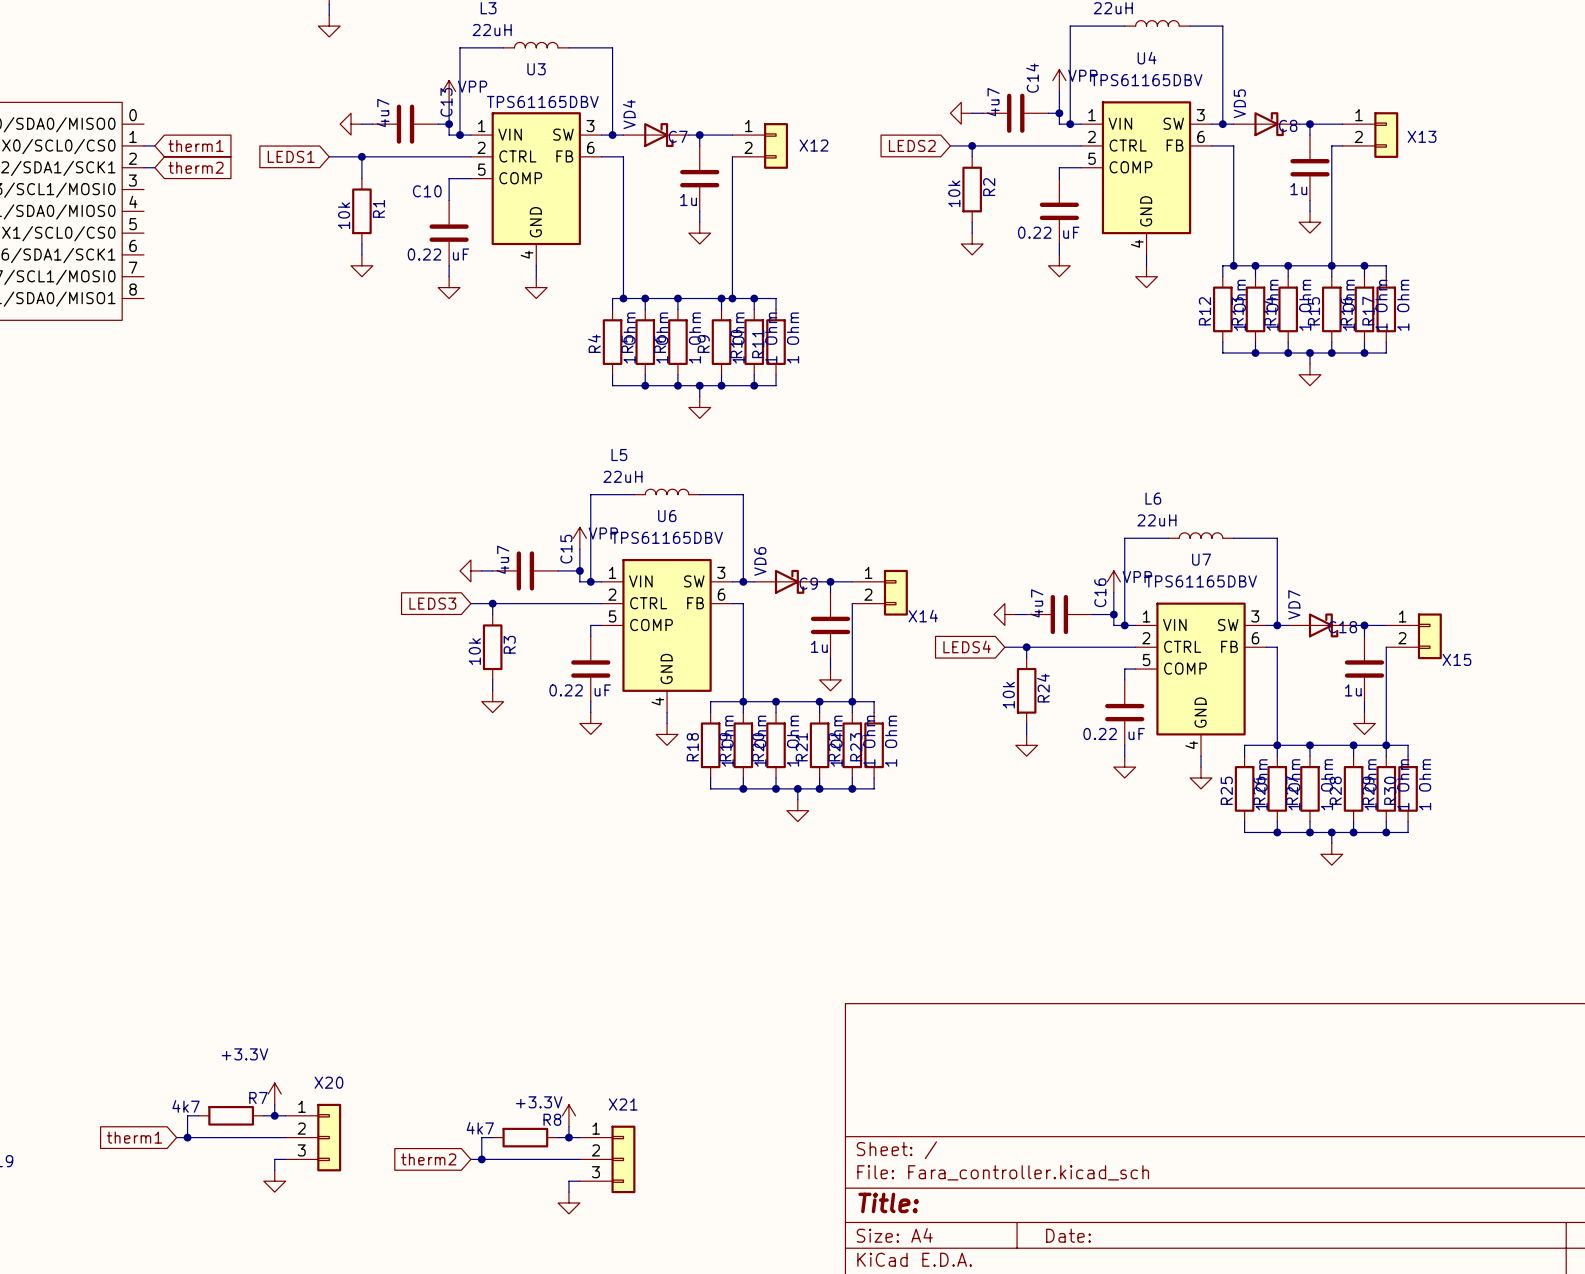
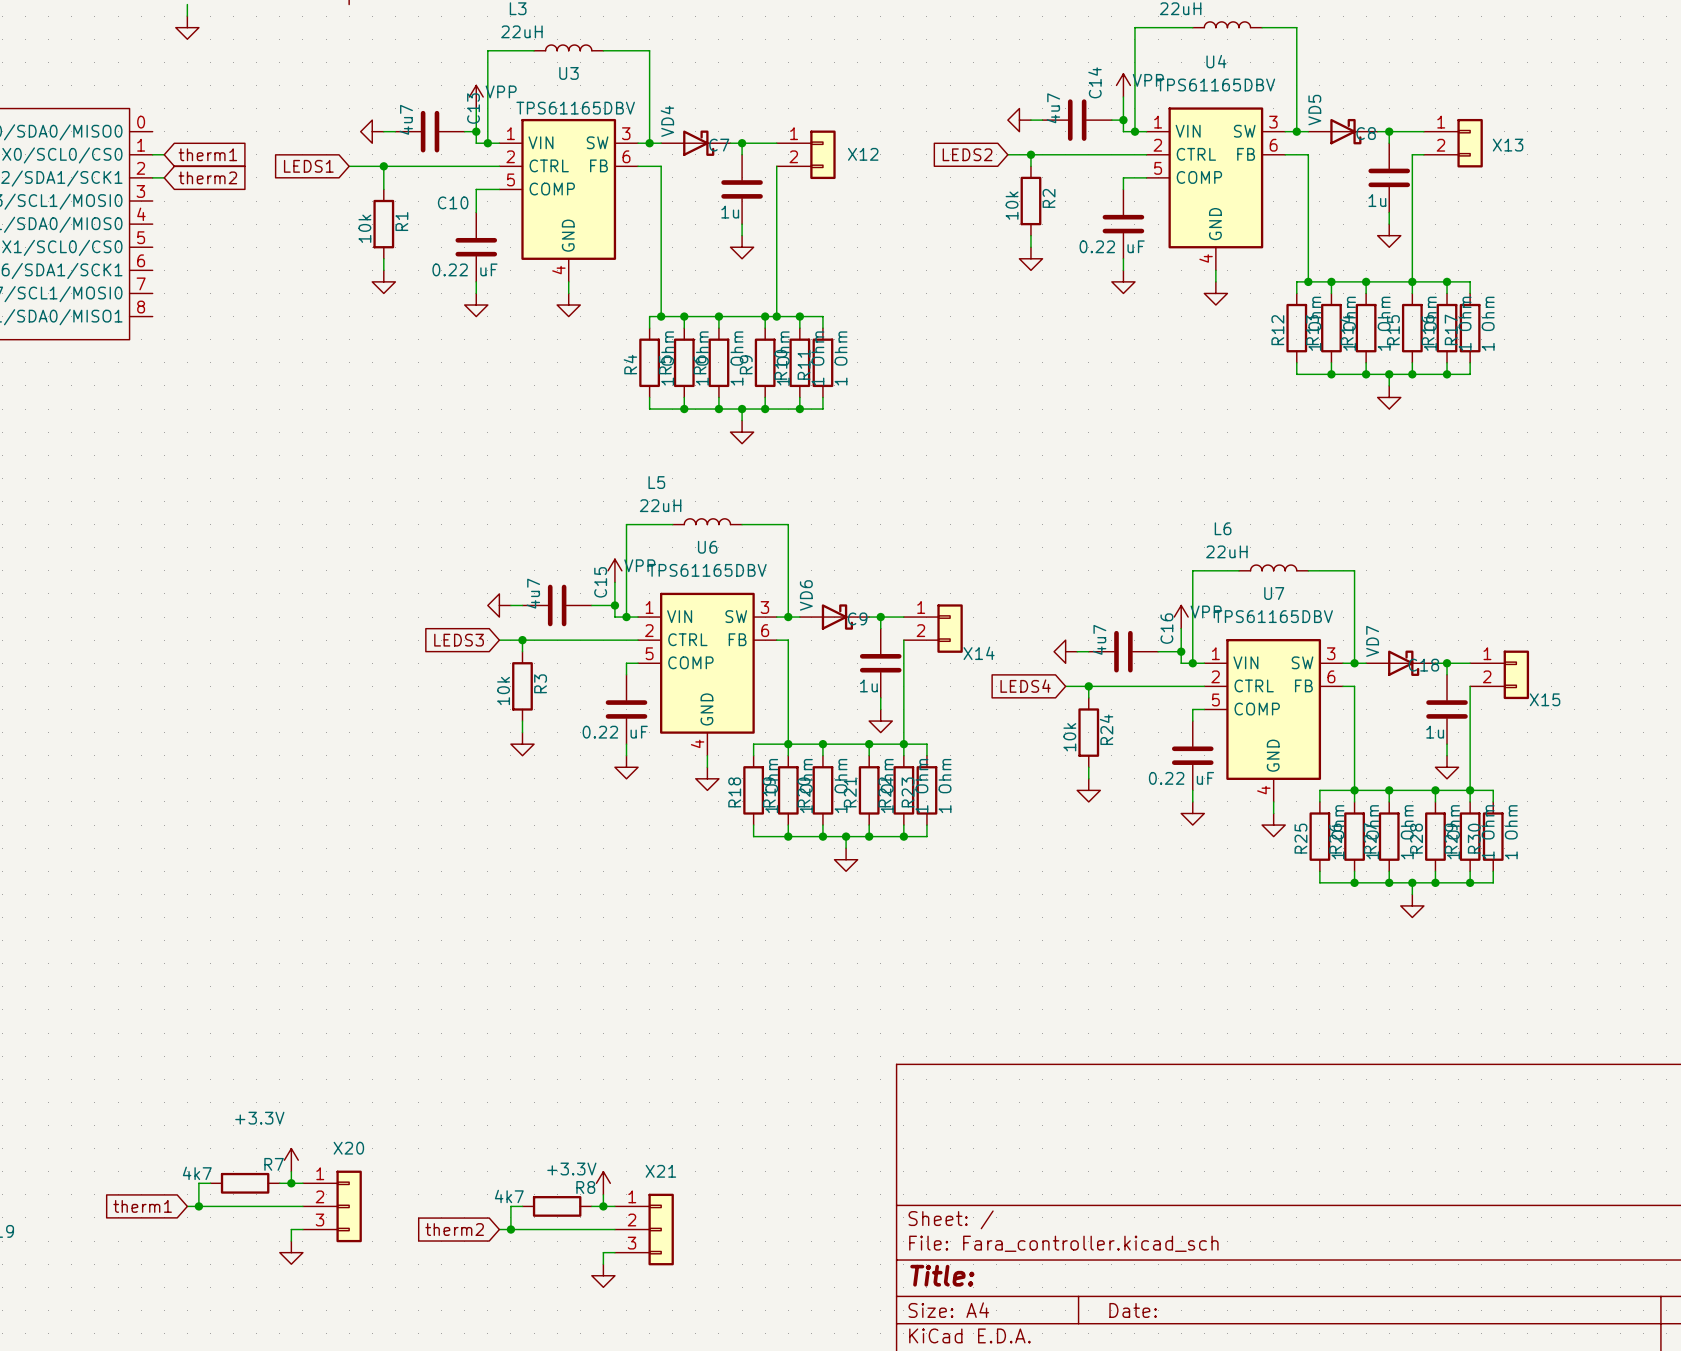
wire: (329, 4) (329, 15) -> (187, 4) (187, 16)
power symbol position: (329, 26) -> (187, 27)

